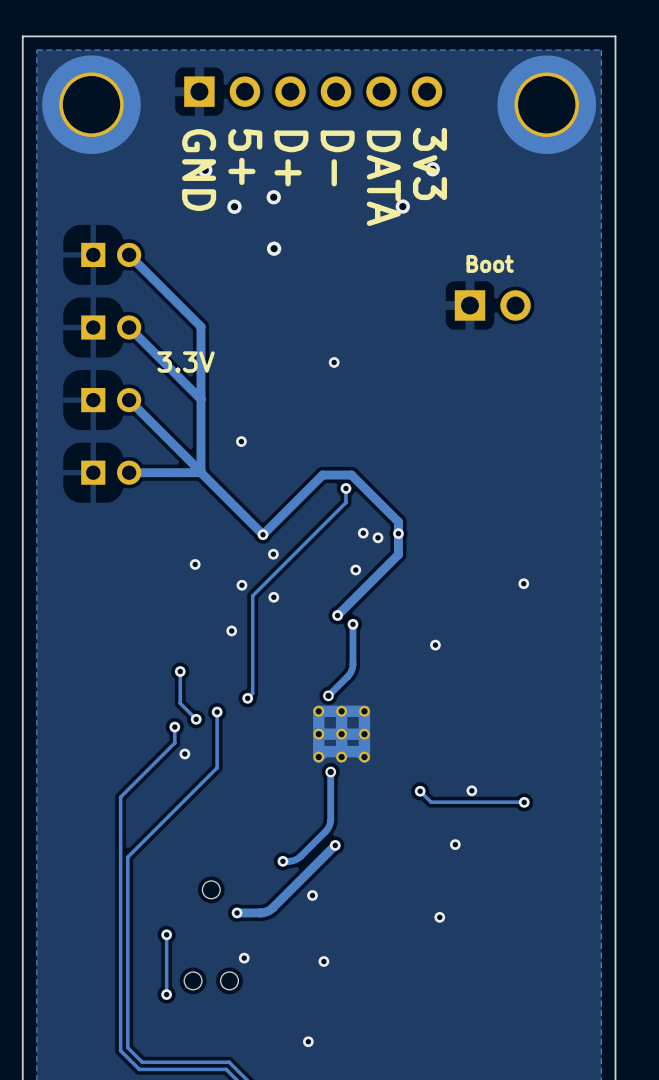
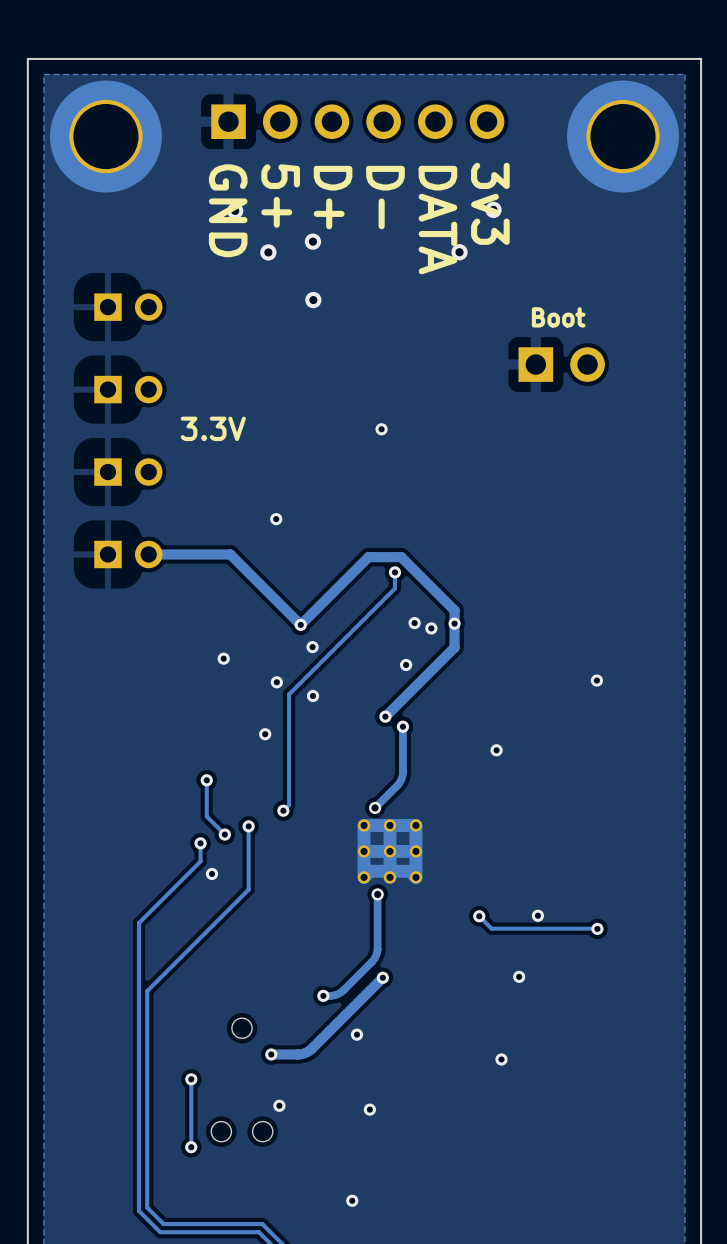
track: (129, 254) (201, 326) (201, 472) -> none
track: (129, 327) (201, 399) -> none
track: (129, 400) (201, 471) -> none

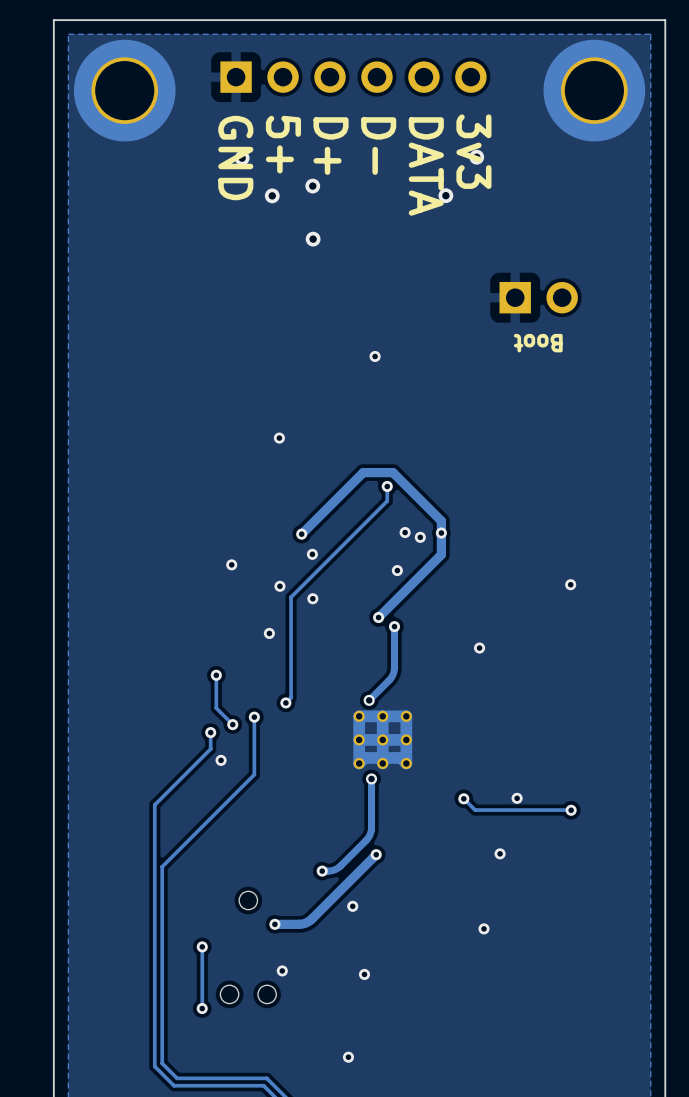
part: (128, 307) -> none
text rotation: 0° (558, 317) -> 180° (538, 343)
text position: Boot (558, 317) -> Boot (538, 343)
part: (128, 389) -> none
text: 3.3V (213, 428) -> none
part: (128, 472) -> none
part: (128, 554) -> none
track: (148, 554) (230, 554) (300, 624) -> none

